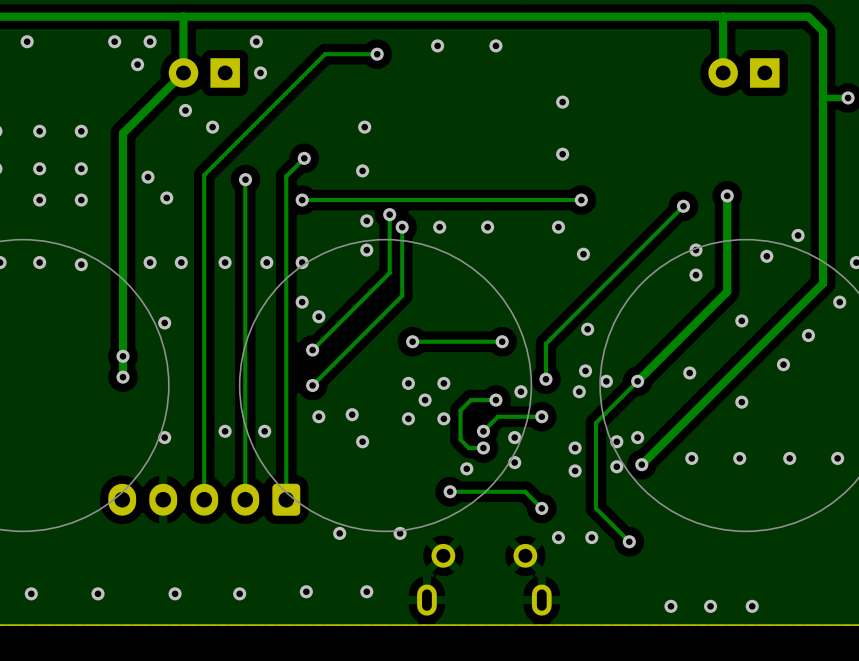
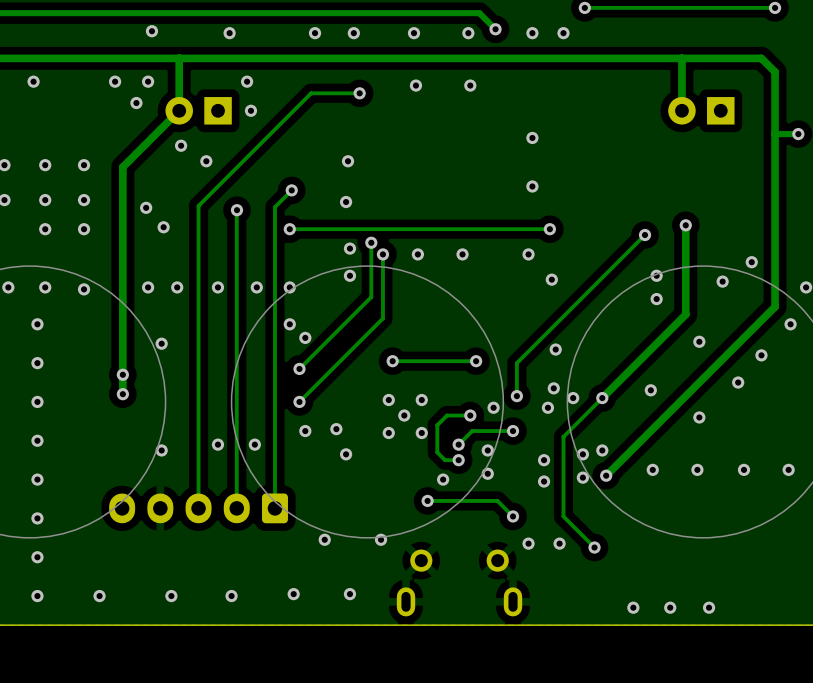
via: none -> (37, 324)
via: none -> (37, 363)
via: none -> (37, 401)
via: none -> (37, 440)
via: none -> (37, 479)
via: none -> (37, 518)
via: none -> (37, 557)

